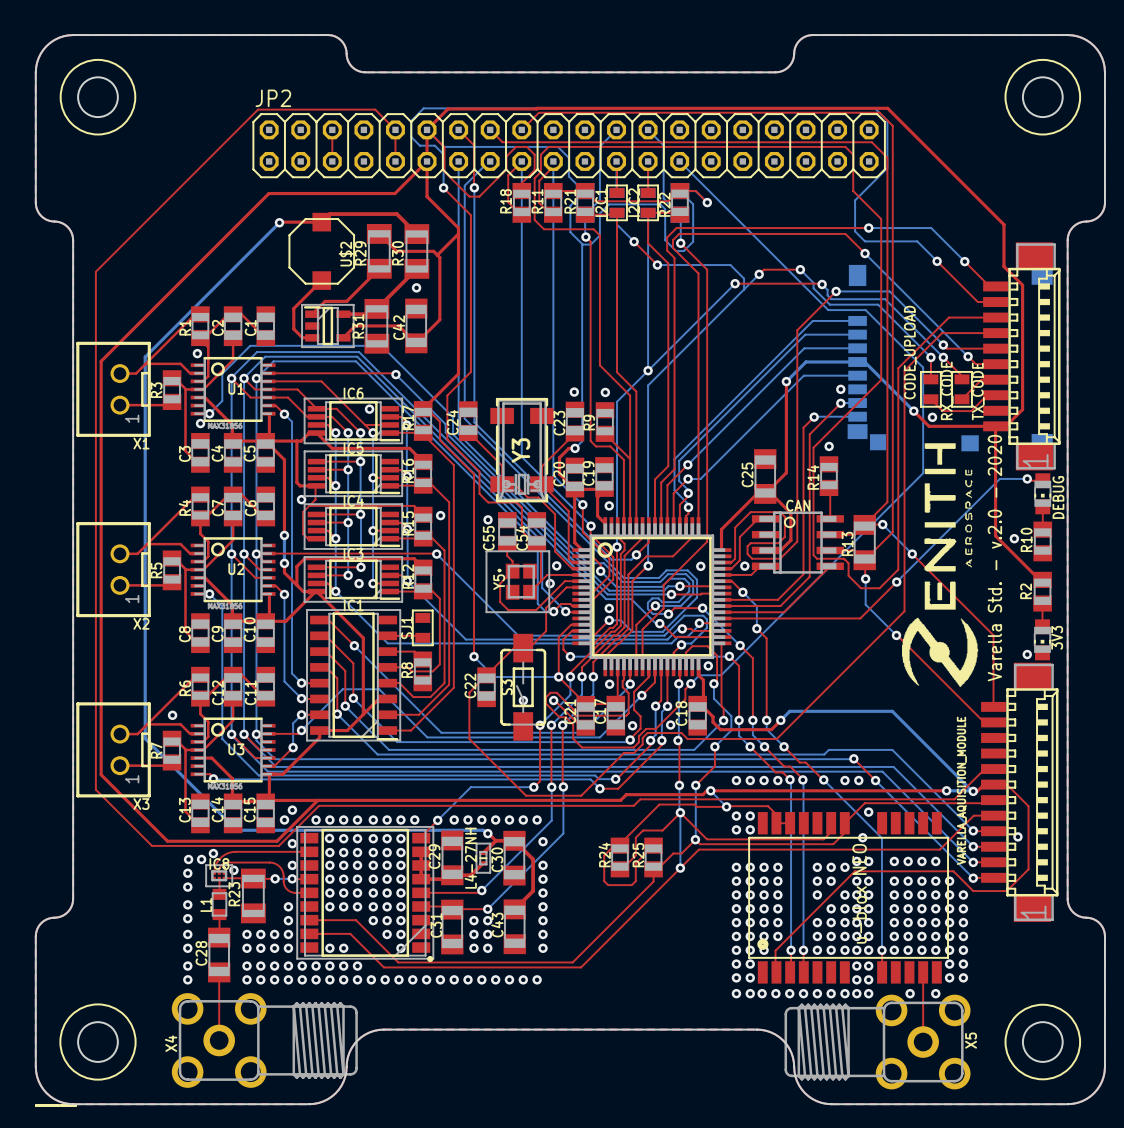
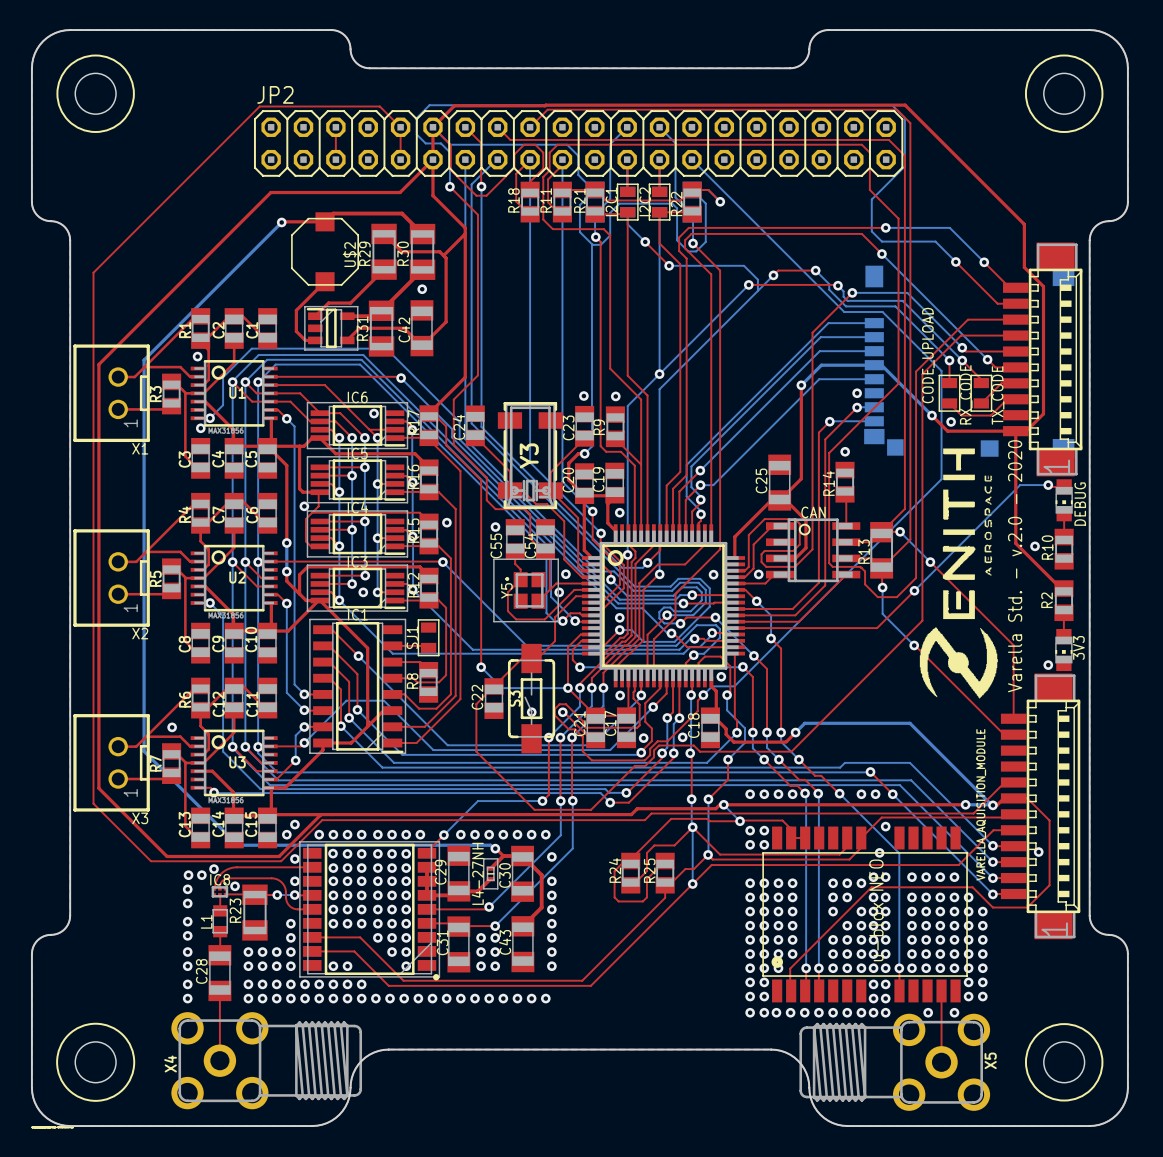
IC8 footprint: [205, 864, 233, 887] -> [211, 882, 229, 898]

